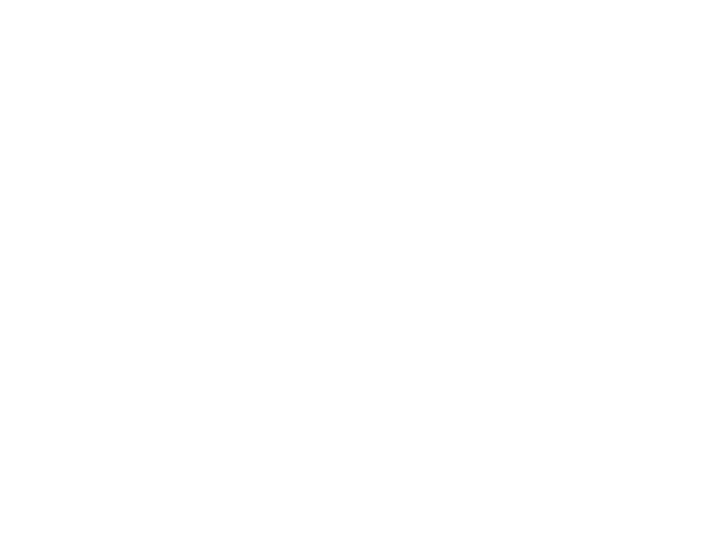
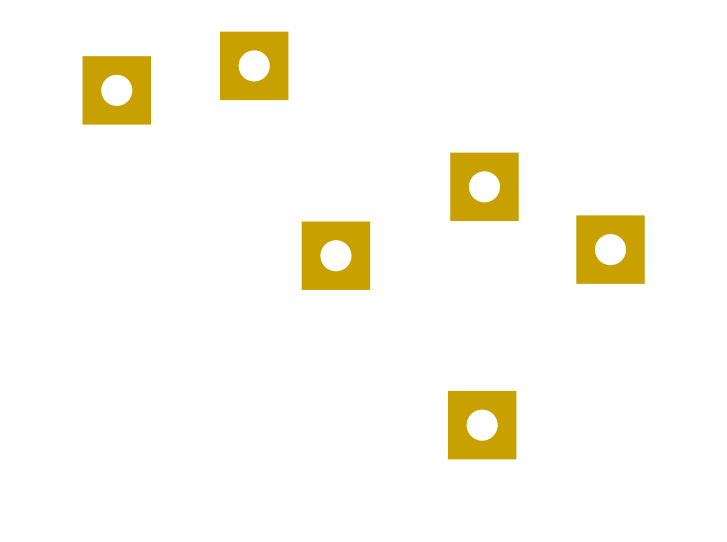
part: none -> (254, 65)
part: none -> (116, 90)
part: none -> (484, 186)
part: none -> (610, 249)
part: none -> (335, 255)
part: none -> (482, 425)

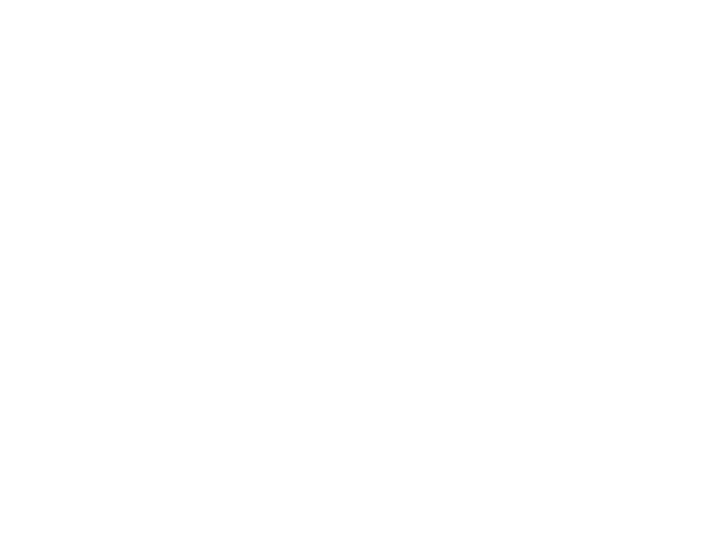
part: (254, 65) -> none
part: (116, 90) -> none
part: (484, 186) -> none
part: (610, 249) -> none
part: (335, 255) -> none
part: (482, 425) -> none

